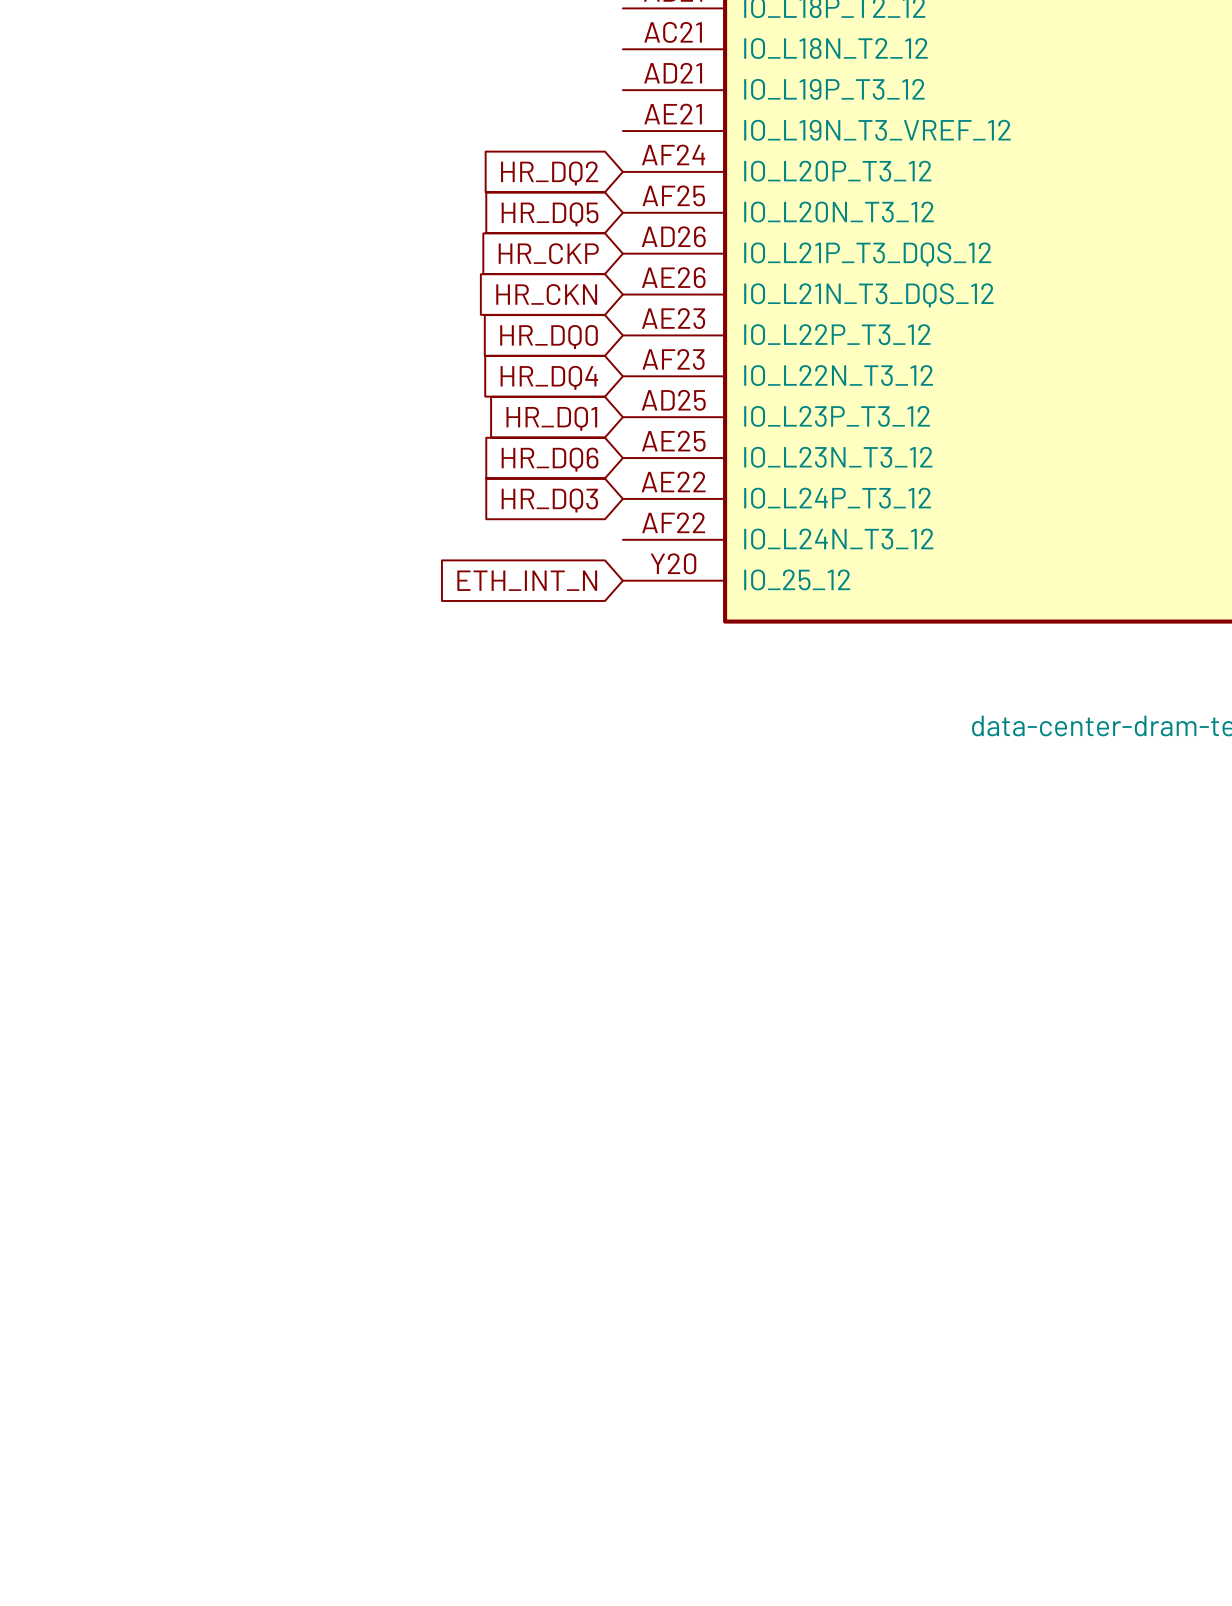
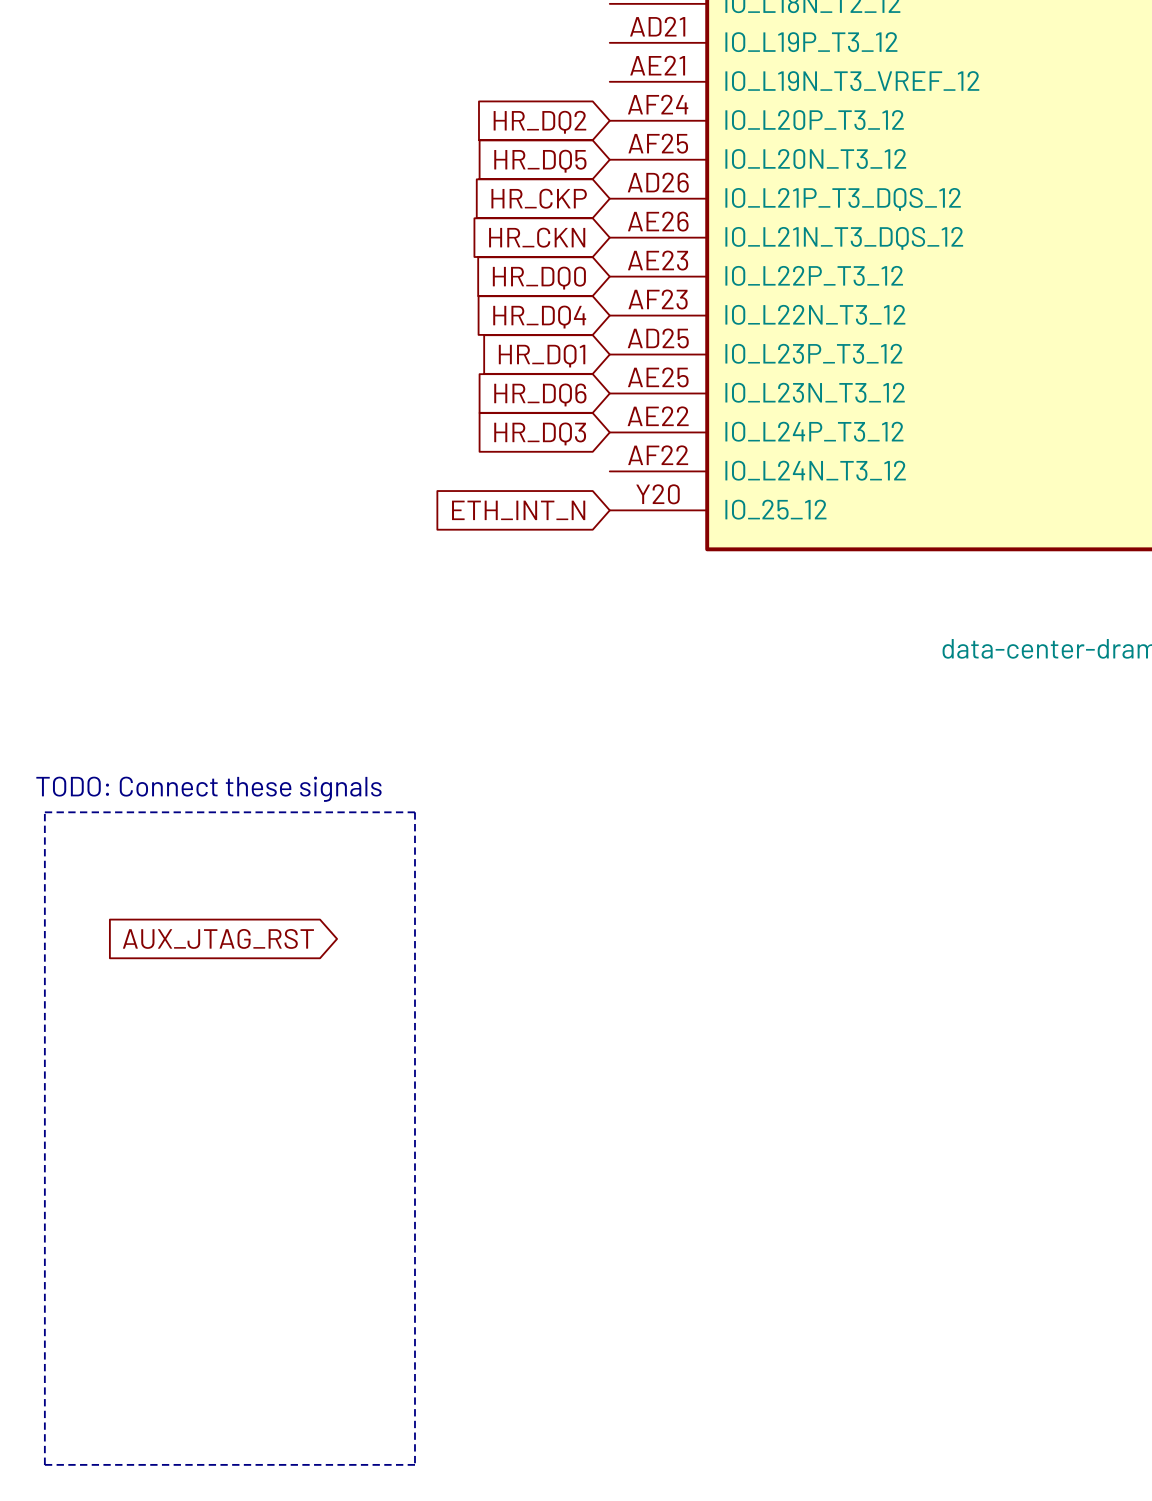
text: none -> TODO: Connect these signals (208, 789)
line: none -> (44, 812) (414, 812) (414, 1464) (44, 1464) (44, 812)
global label: none -> AUX_JTAG_RST (218, 938)

